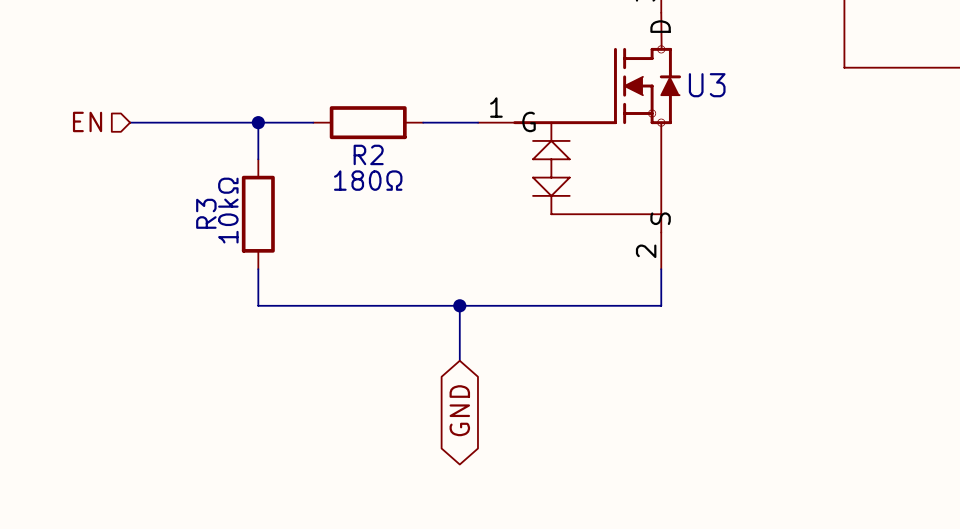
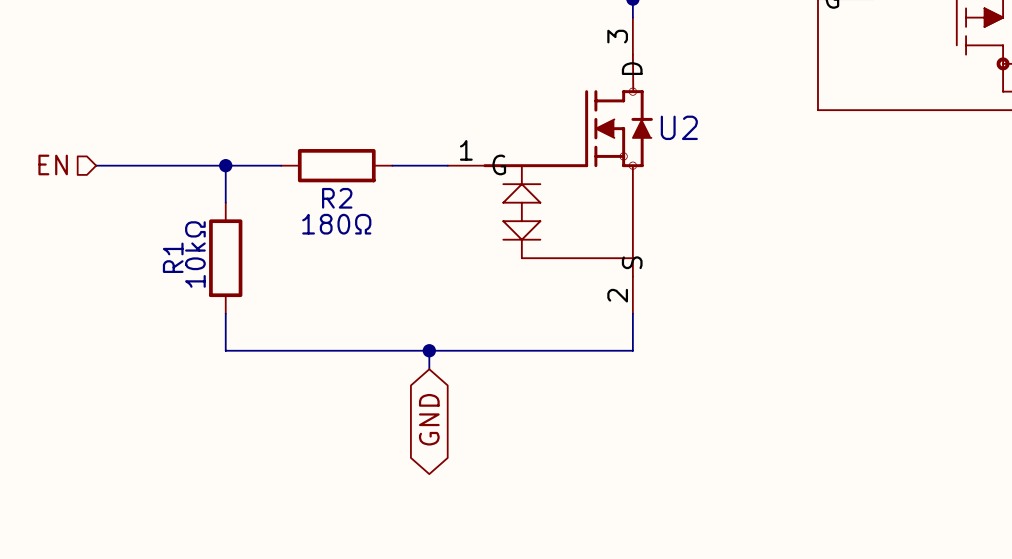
U3 name: U3 (707, 85) -> U2 (679, 127)
R3 name: R3 (206, 213) -> R1 (173, 257)
wire: (459, 324) (459, 360) -> none
global label position: GND (459, 410) -> GND (429, 419)

